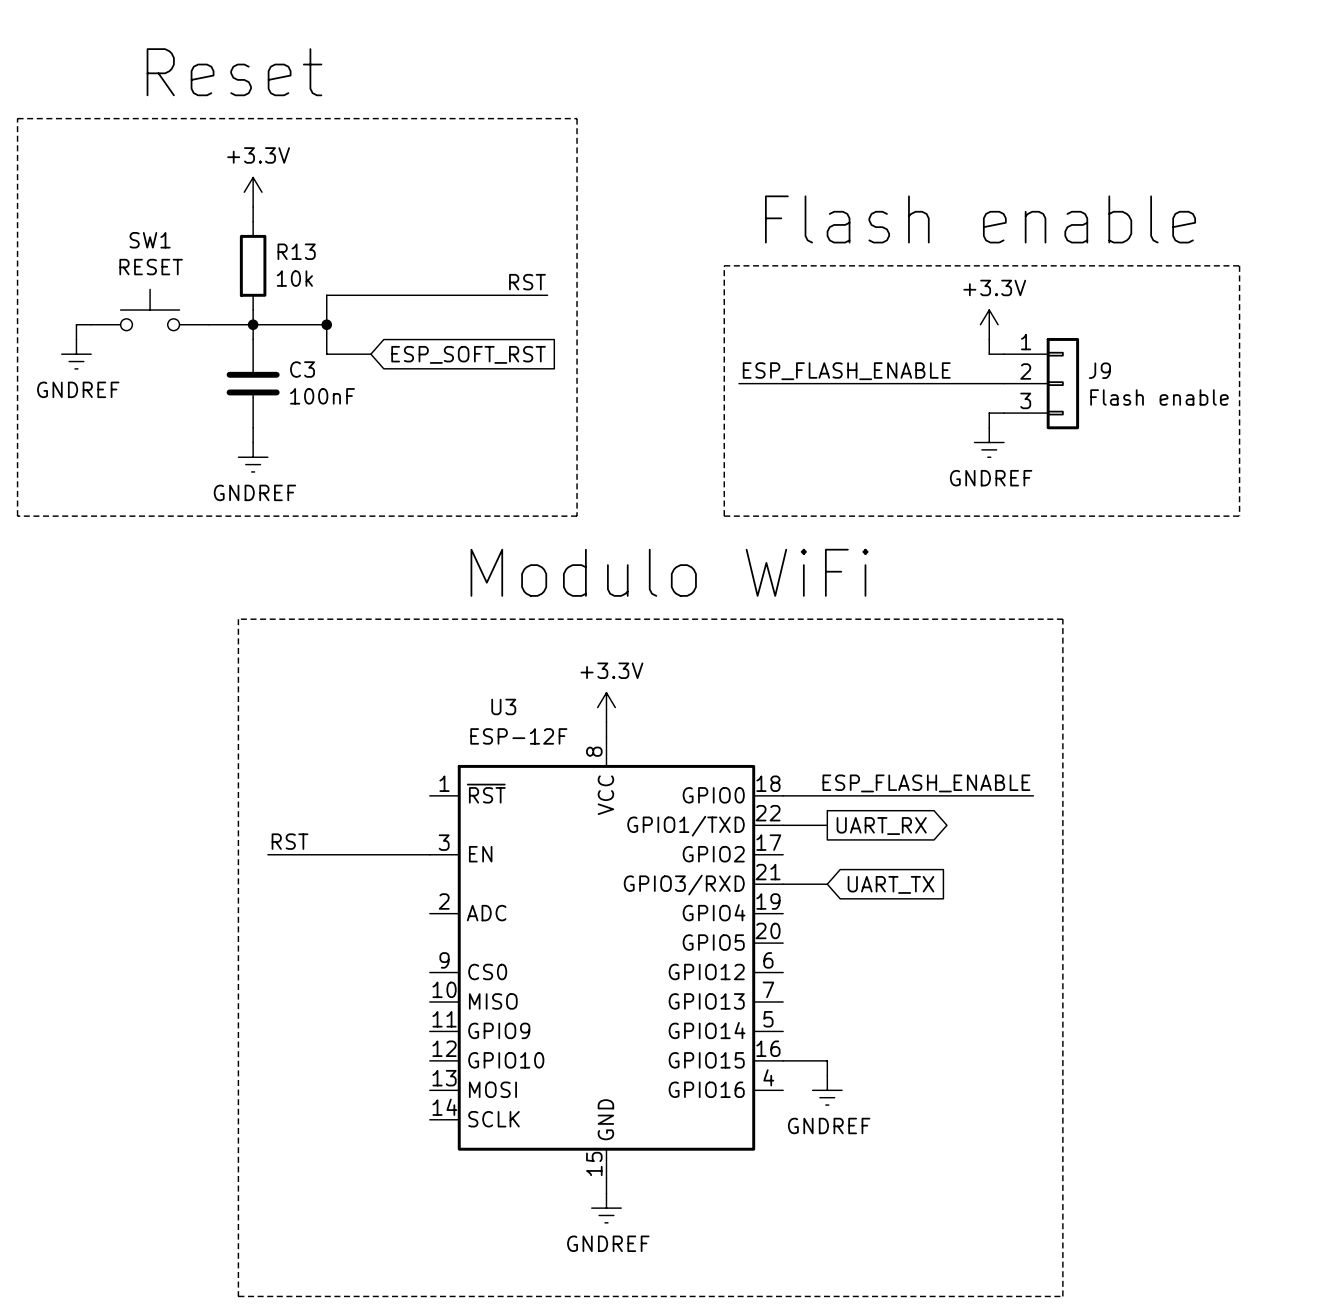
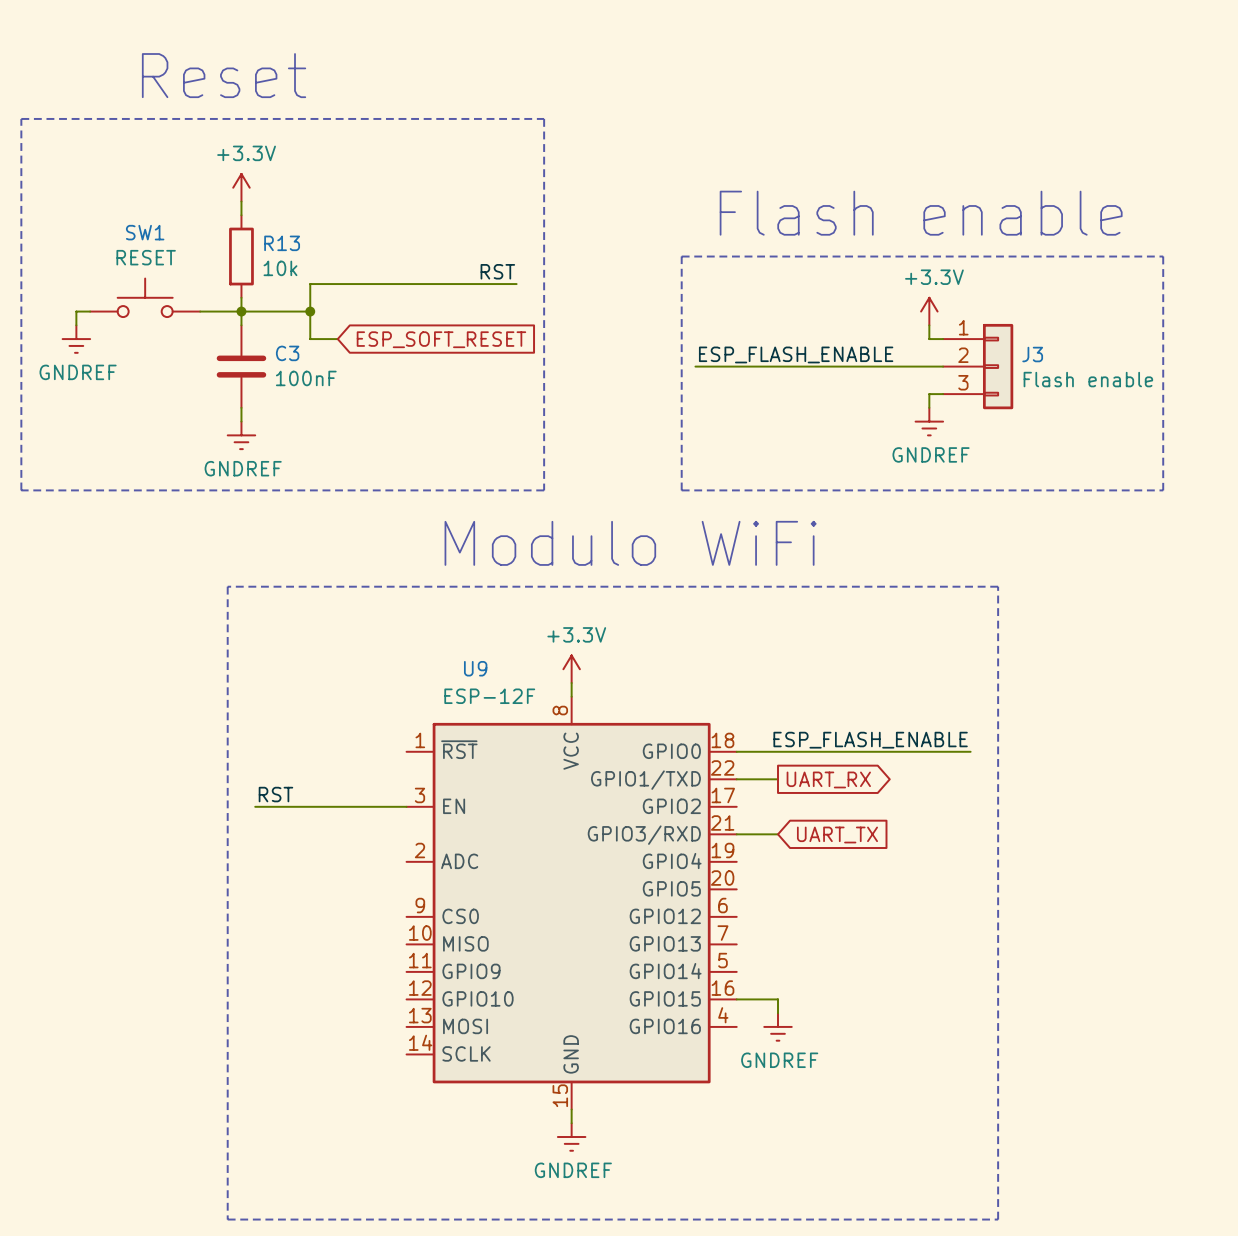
wire: (356, 354) (370, 354) -> none
global label: ESP_SOFT_RST (468, 354) -> ESP_SOFT_RESET (441, 339)
J9 name: J9 (1099, 370) -> J3 (1032, 354)
U3 name: U3 (503, 706) -> U9 (475, 668)

